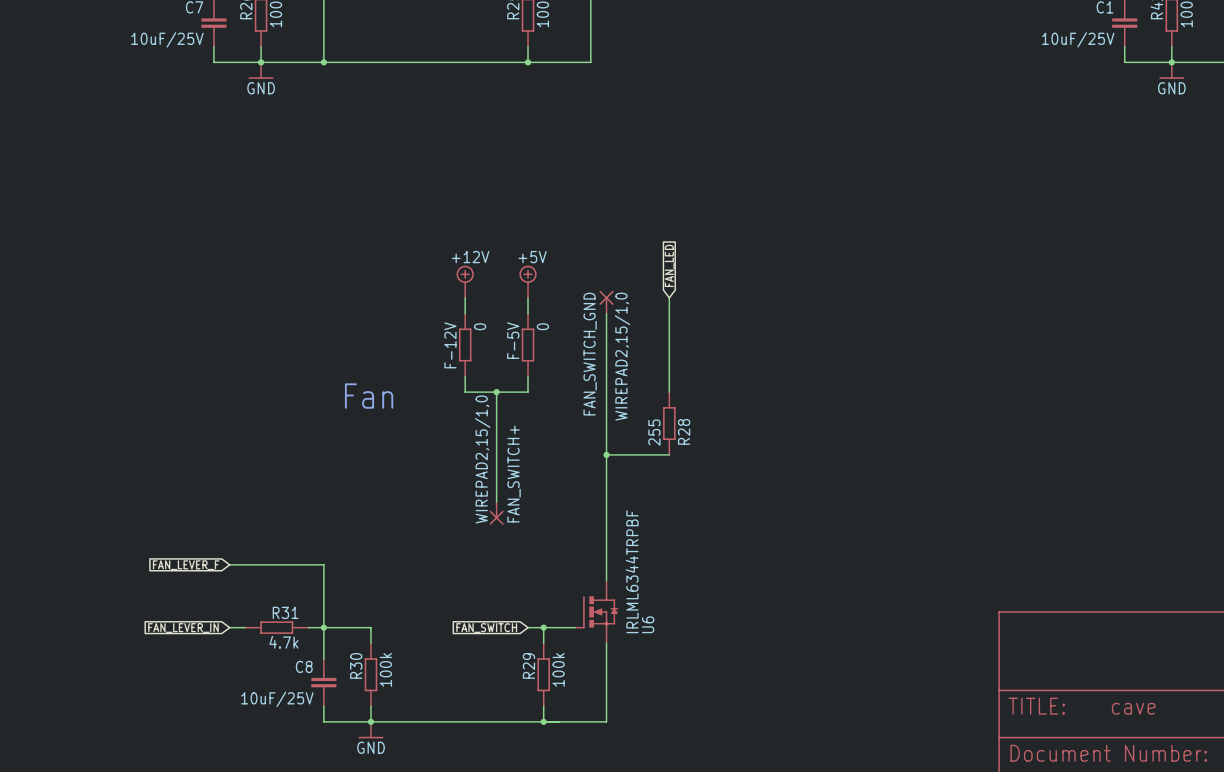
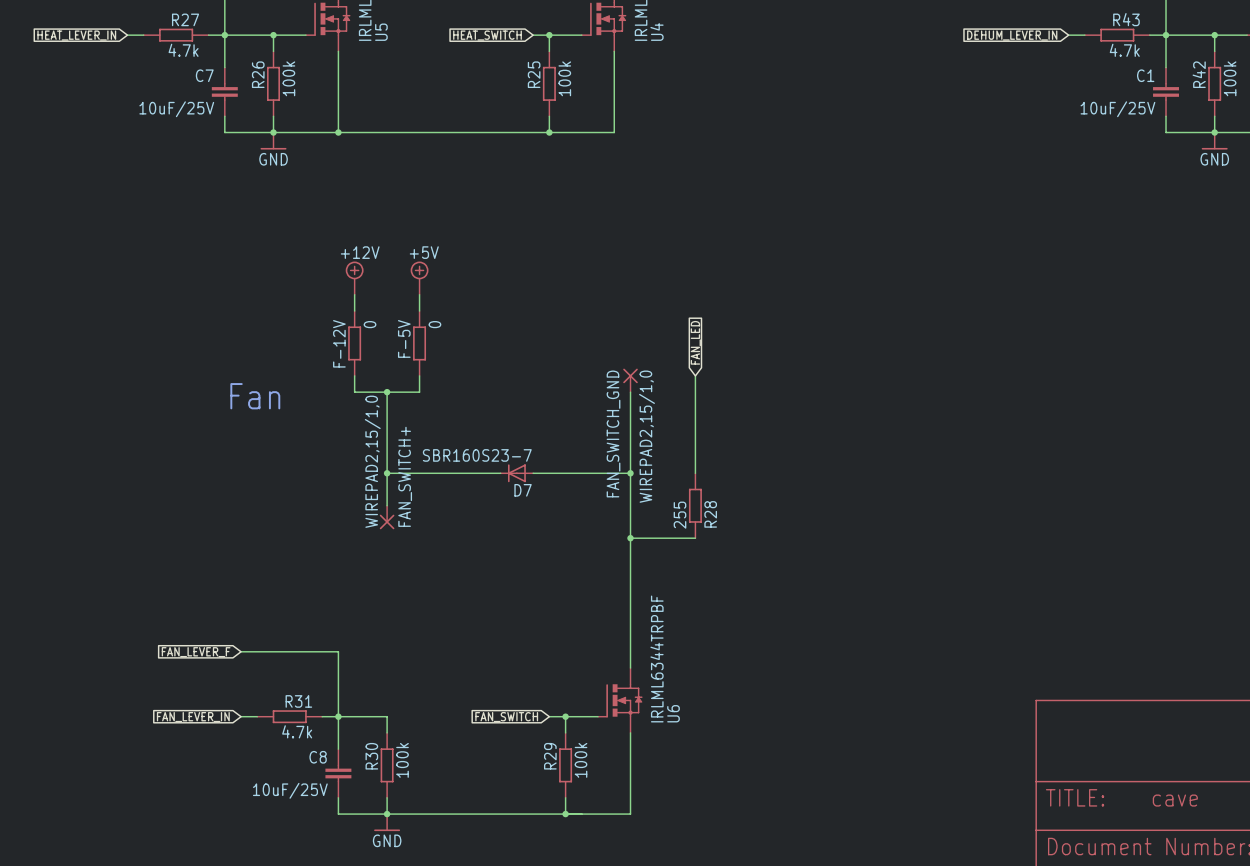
power symbol position: +12V (465, 281) -> +12V (354, 278)
power symbol position: +5V (528, 281) -> +5V (419, 278)
wire: none -> (354, 375) (354, 392) (419, 392) (419, 375)
wire: (465, 297) (465, 313) -> (354, 294) (354, 311)
wire: (528, 297) (528, 313) -> (419, 294) (419, 311)
junction: none -> (387, 392)
F-12V position: (465, 345) -> (354, 343)
F-5V position: (528, 345) -> (419, 343)
wire: (465, 376) (465, 392) -> (387, 473) (484, 473)
wire: (528, 376) (528, 392) -> (630, 473) (549, 473)
junction: none -> (387, 473)
wire: (496, 392) (496, 502) -> (387, 392) (387, 505)
D7: none -> SBR160S23-7 (516, 473)
junction: (496, 392) -> none
junction: none -> (630, 473)
text position: Fan (369, 396) -> Fan (255, 396)
FAN_SWITCH+ position: (496, 513) -> (387, 517)

